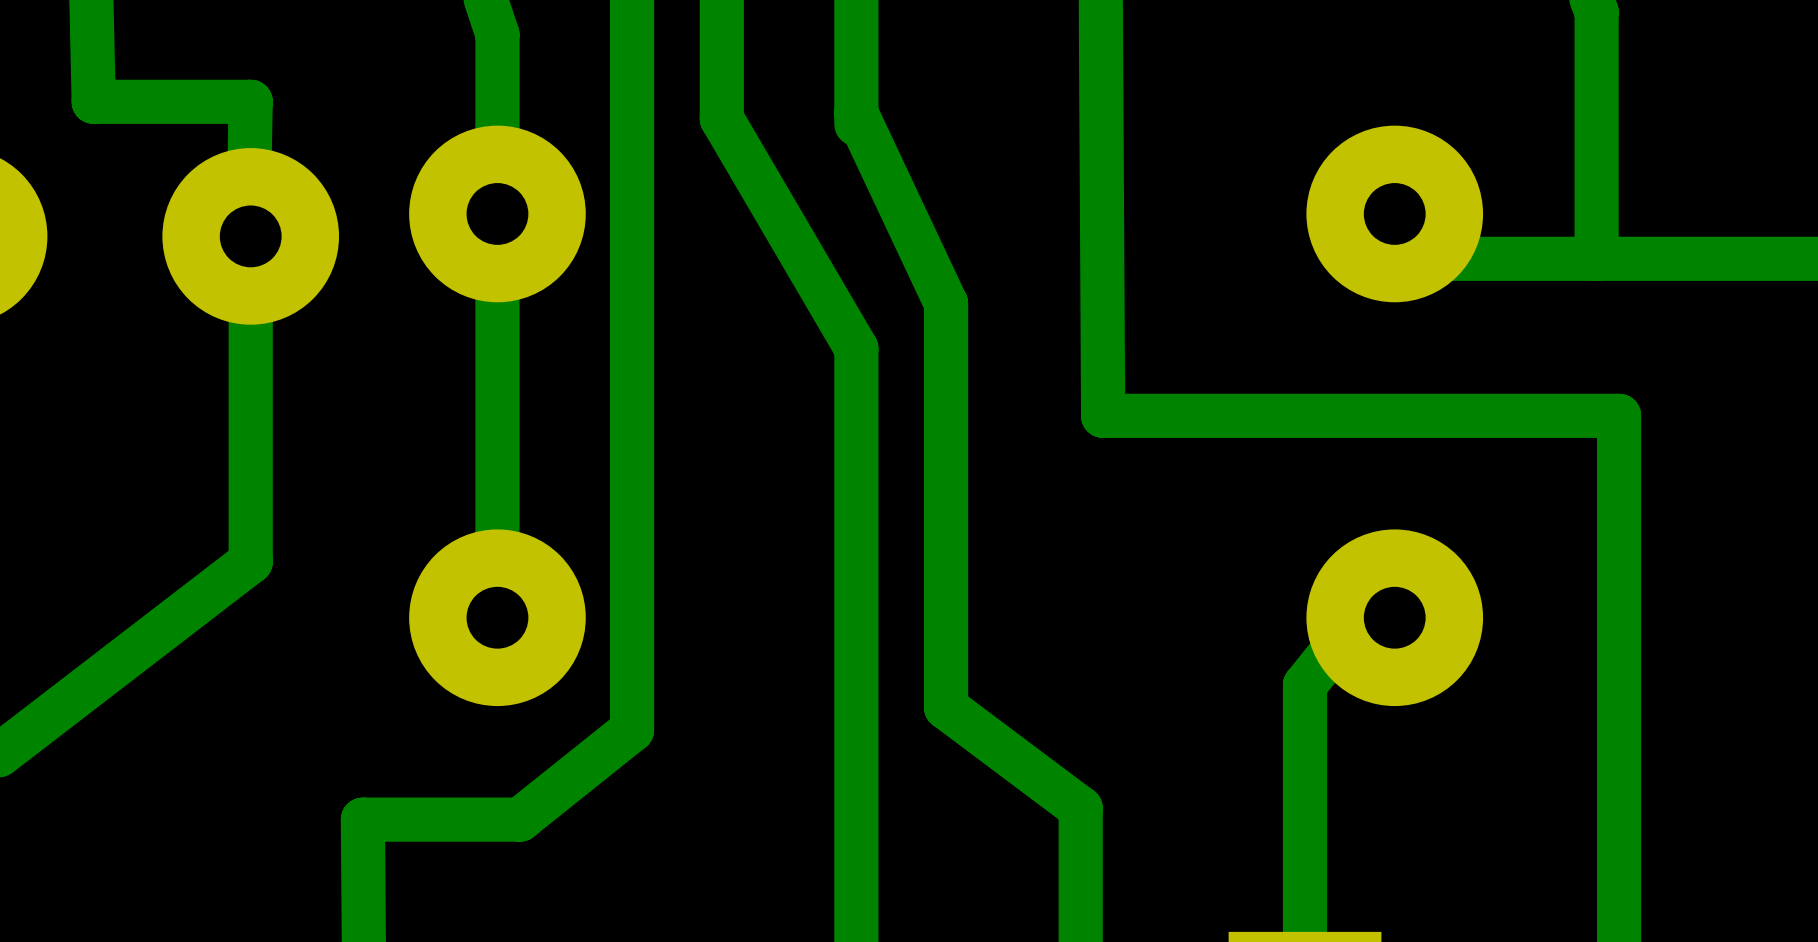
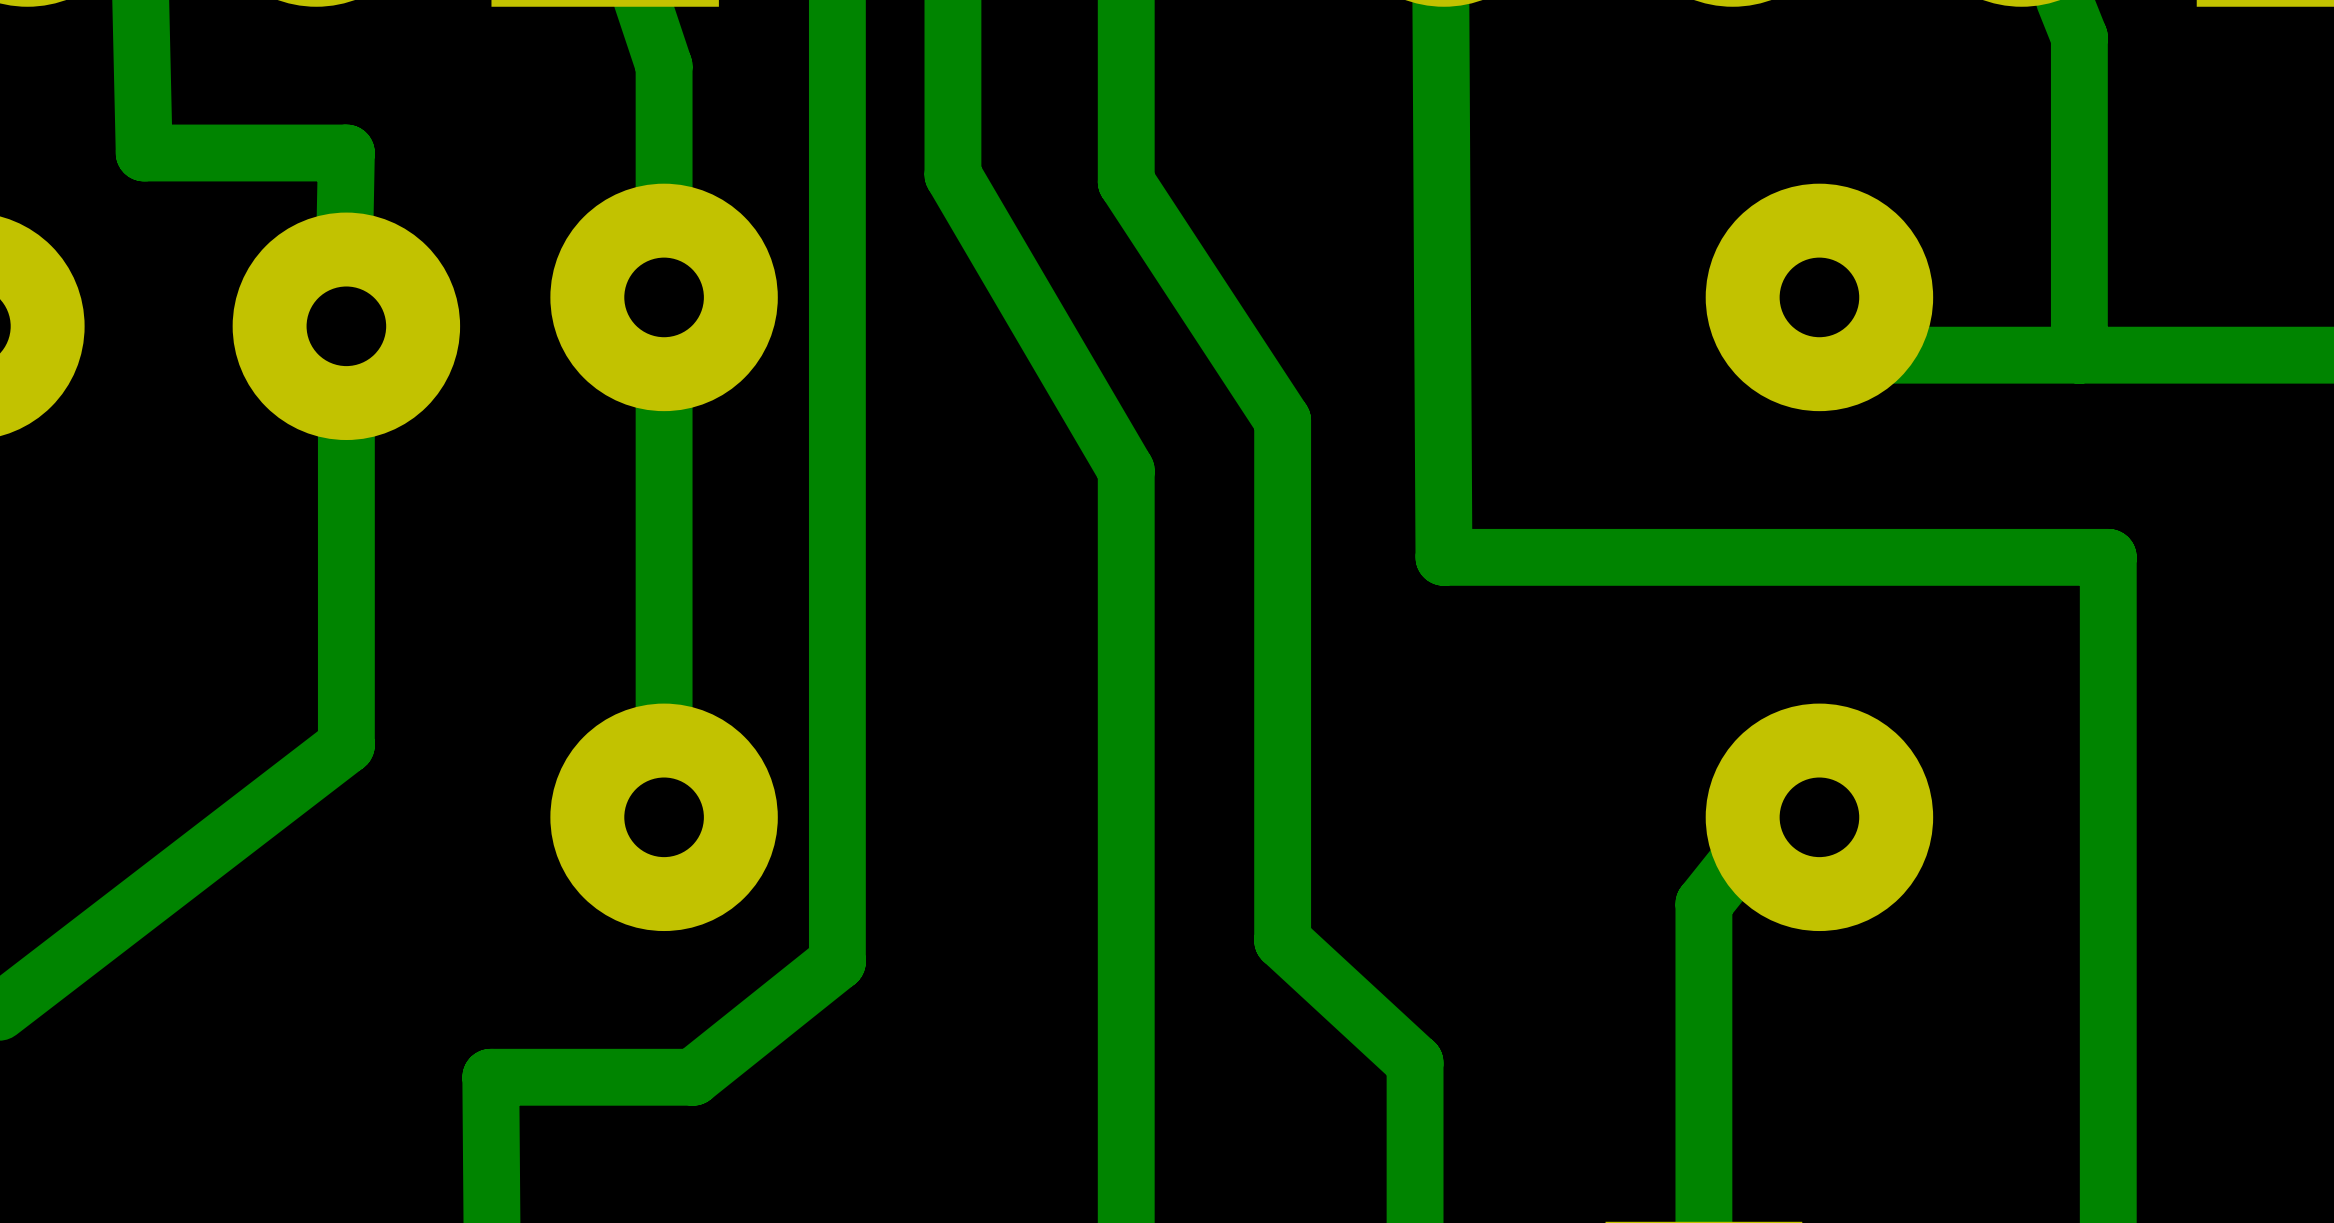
bottom track: (856, 113) (946, 303) (946, 707) (1080, 808) -> (1126, 181) (1282, 420) (1282, 940) (1415, 1062)

